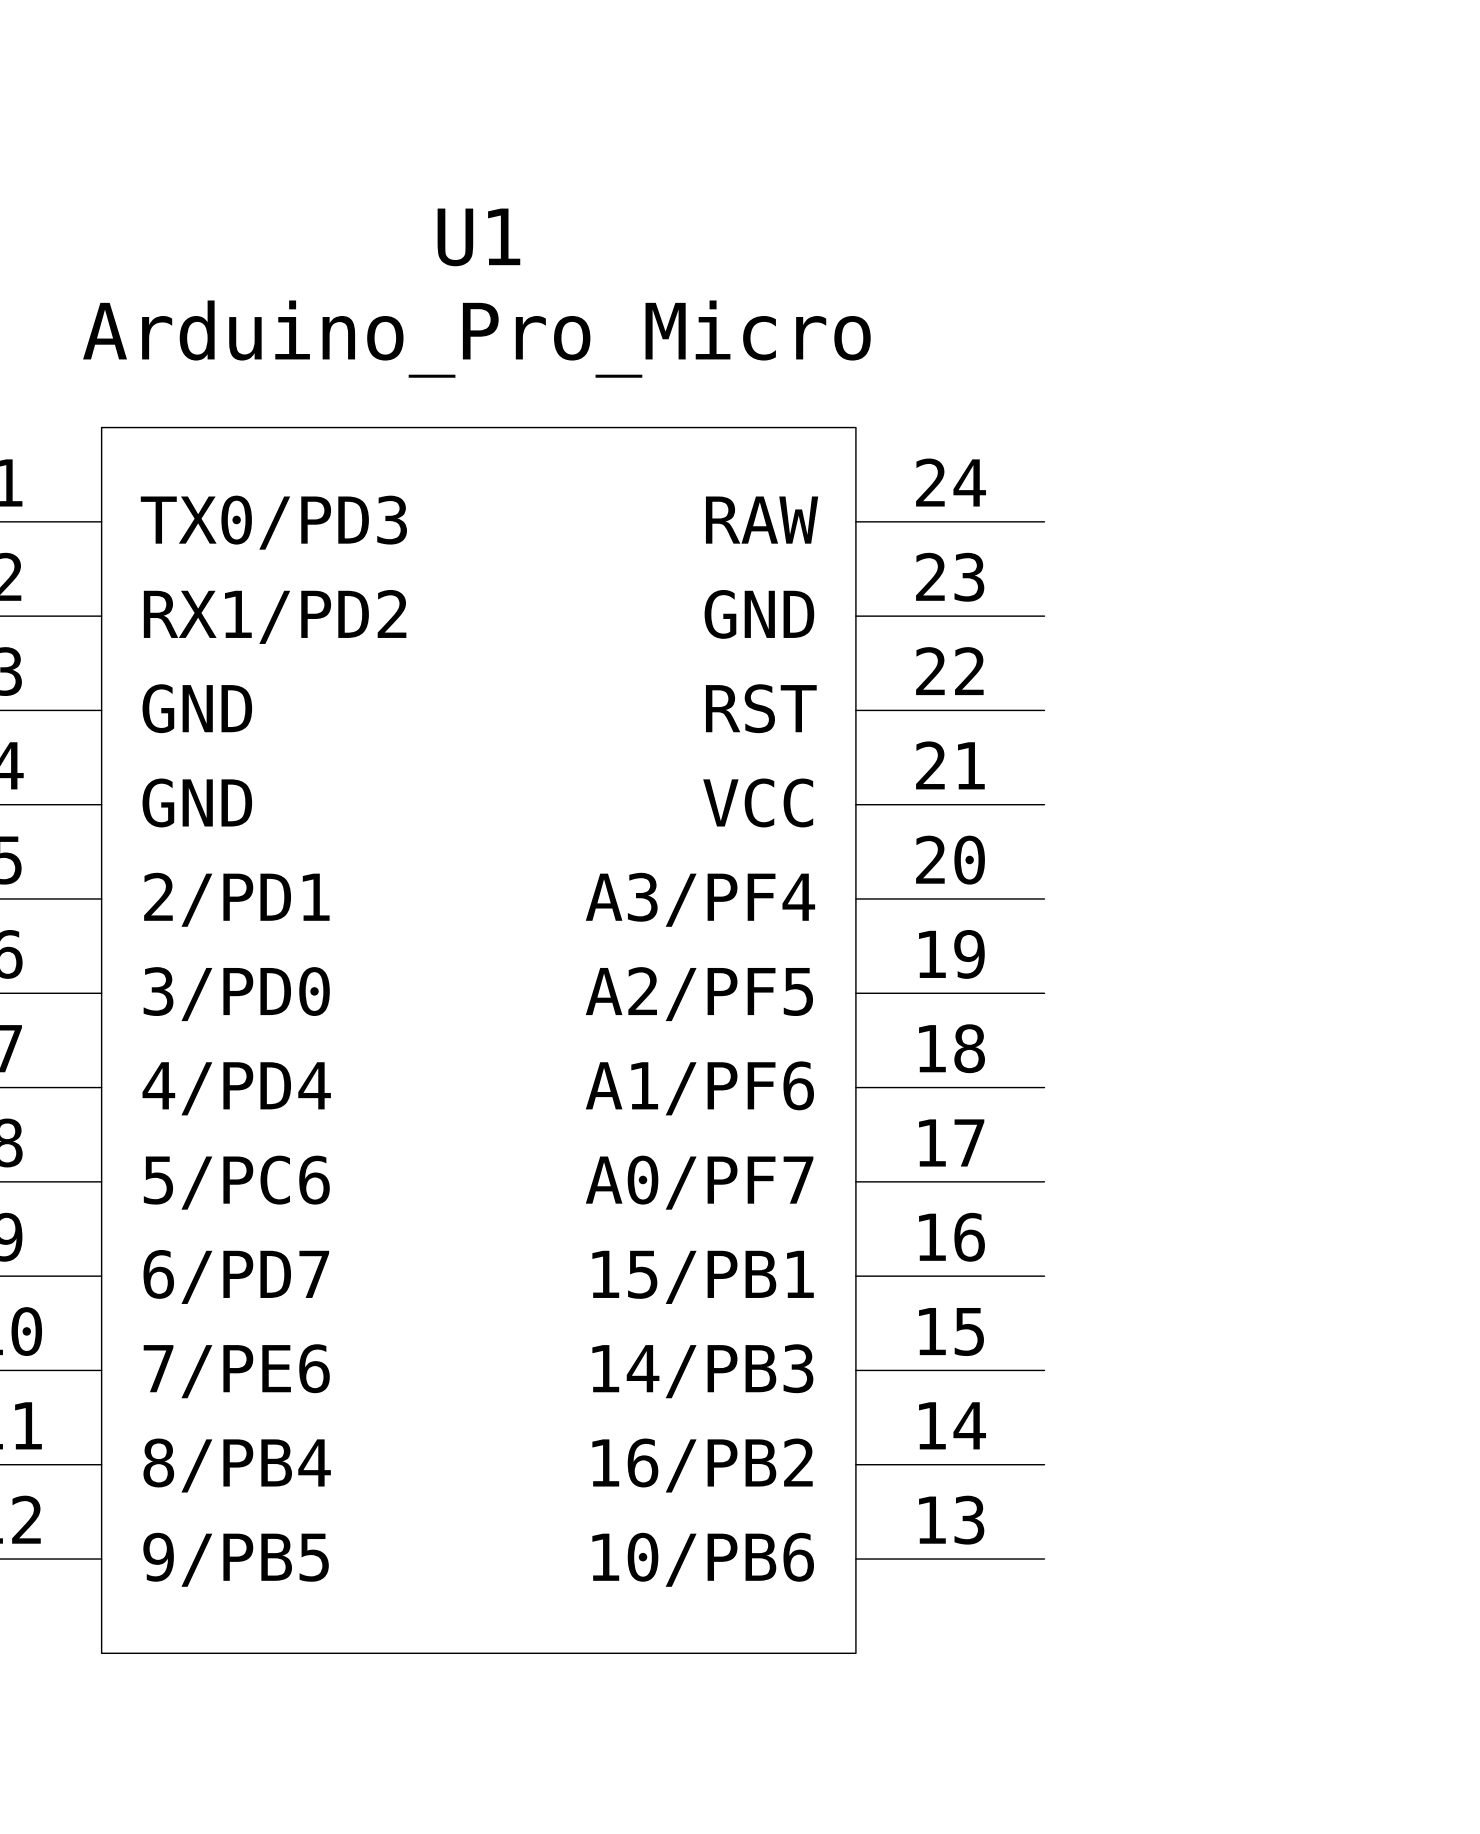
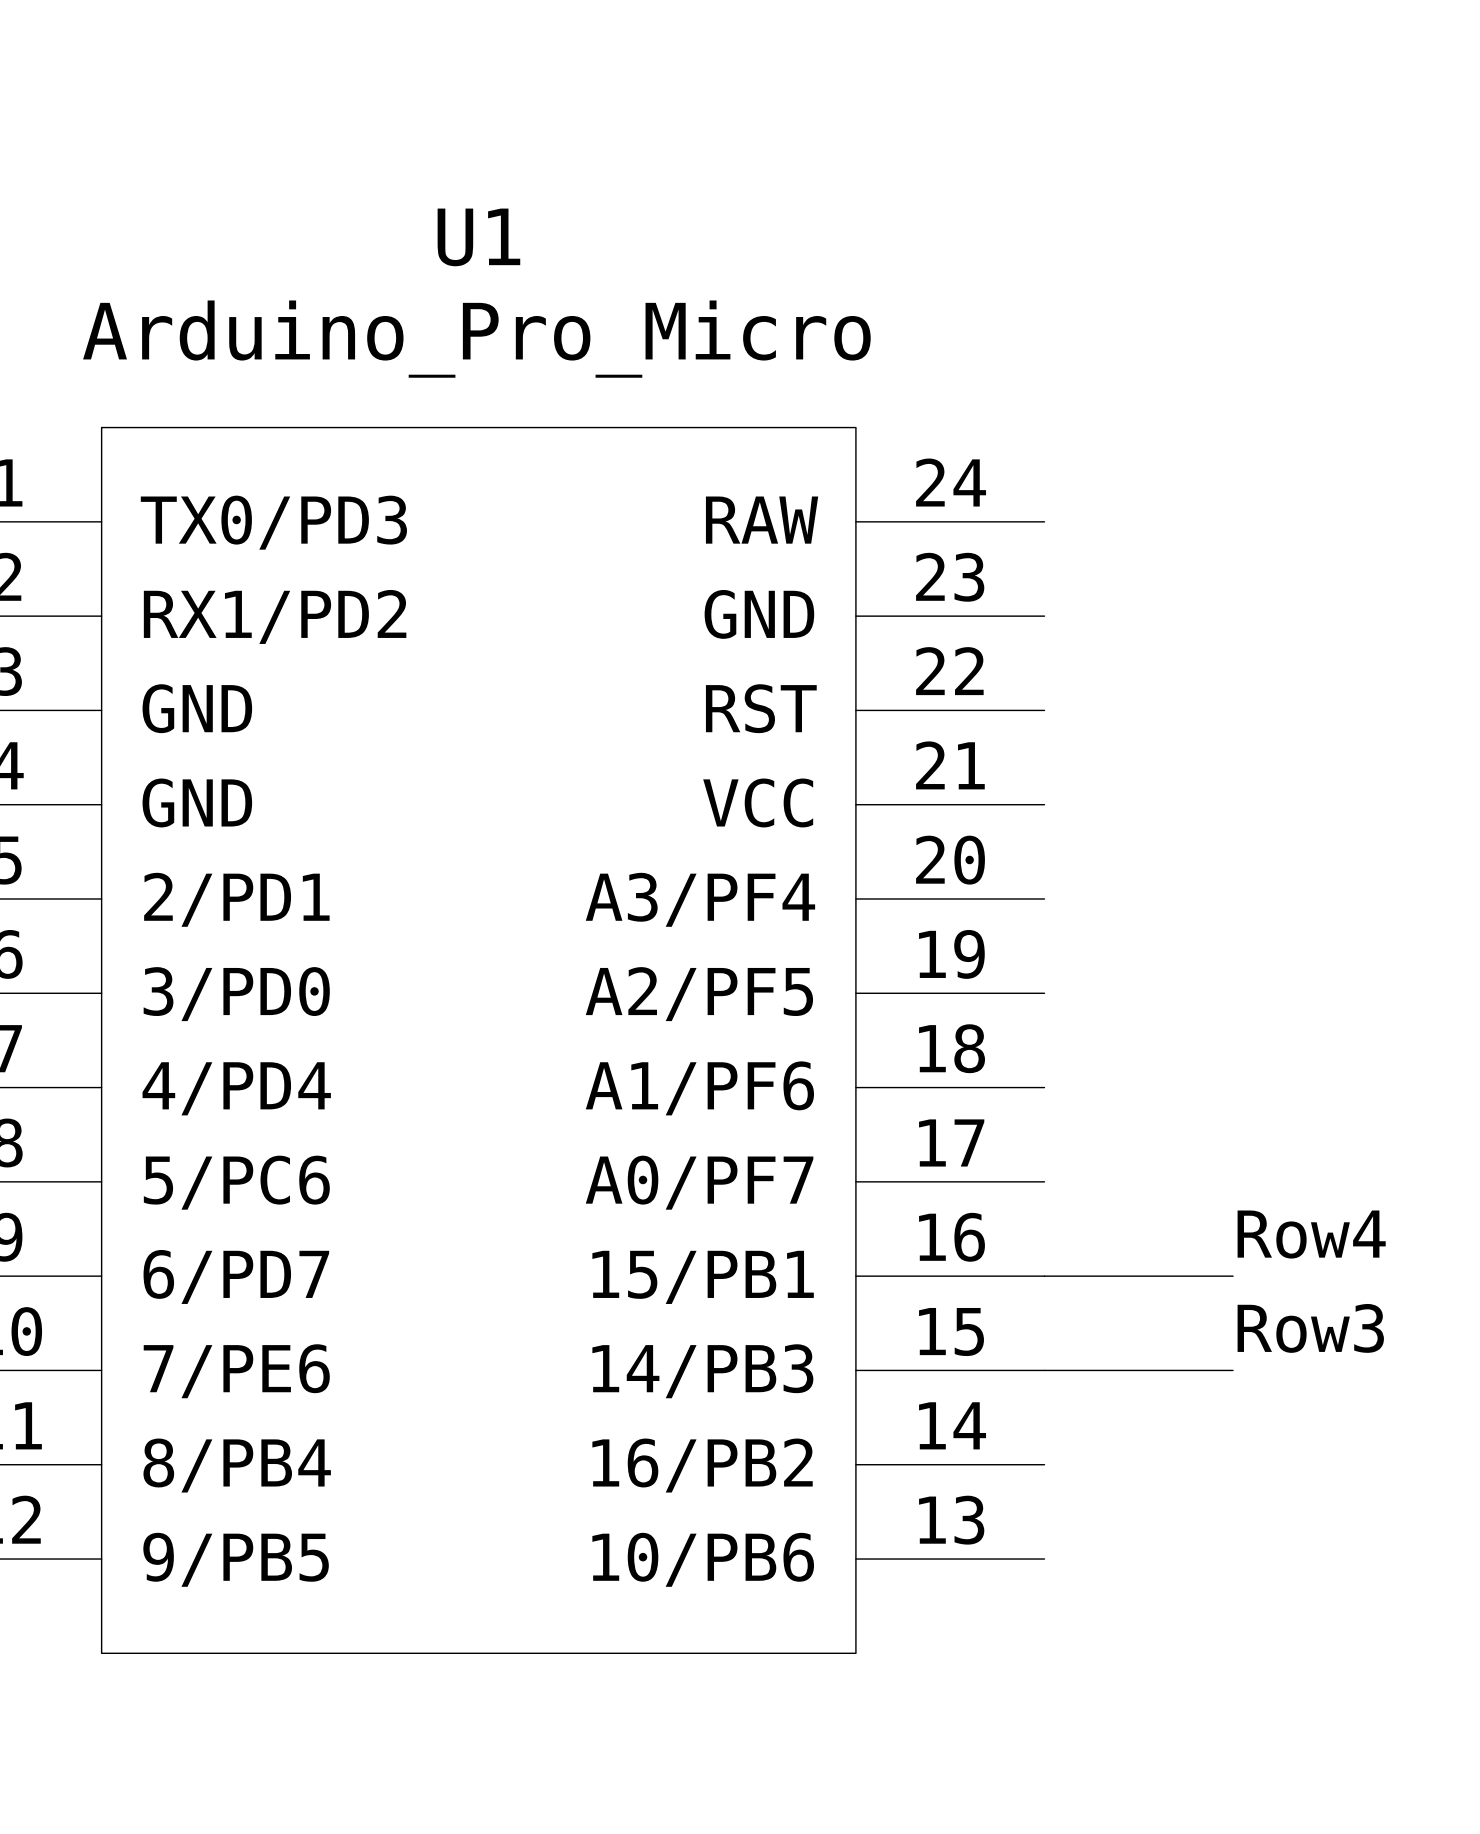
label: none -> Row4 (1311, 1234)
wire: none -> (1044, 1276) (1233, 1276)
label: none -> Row3 (1310, 1328)
wire: none -> (1044, 1370) (1233, 1370)

